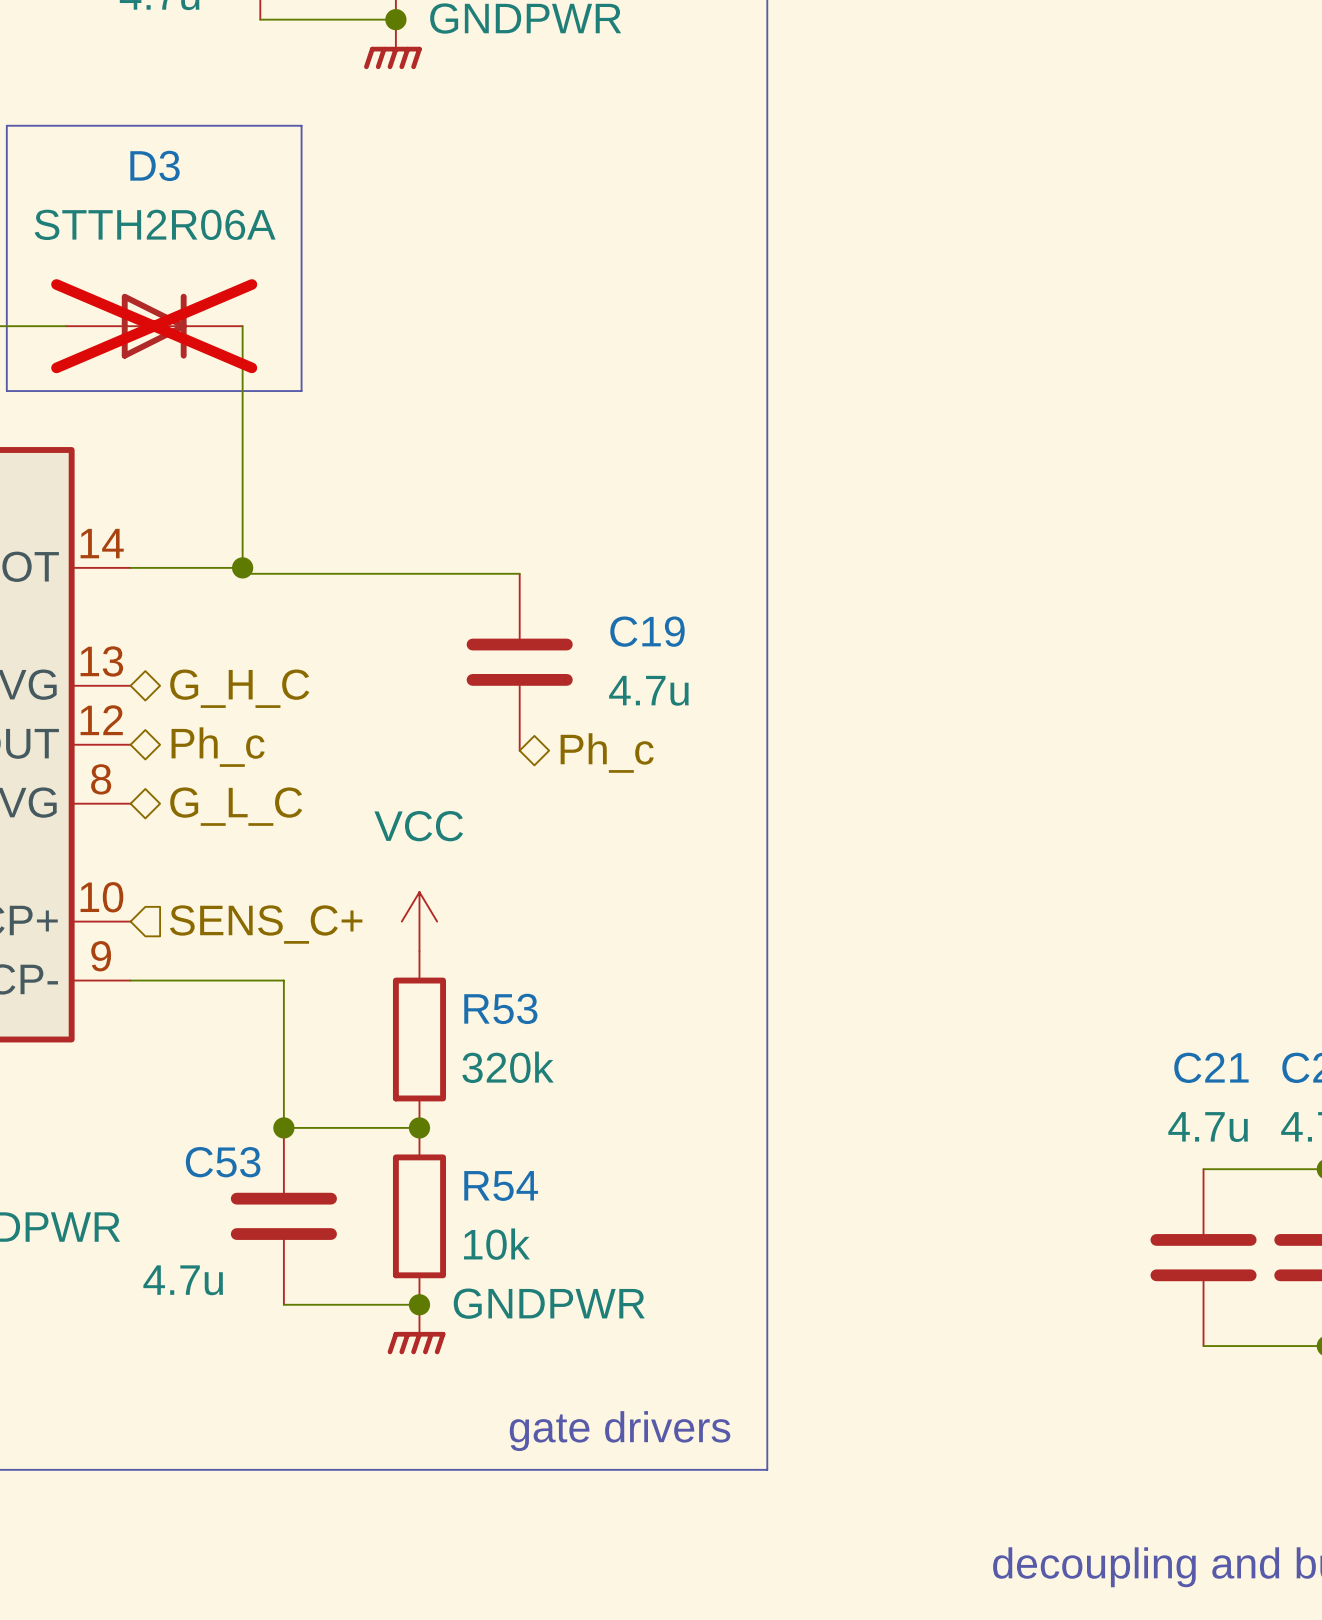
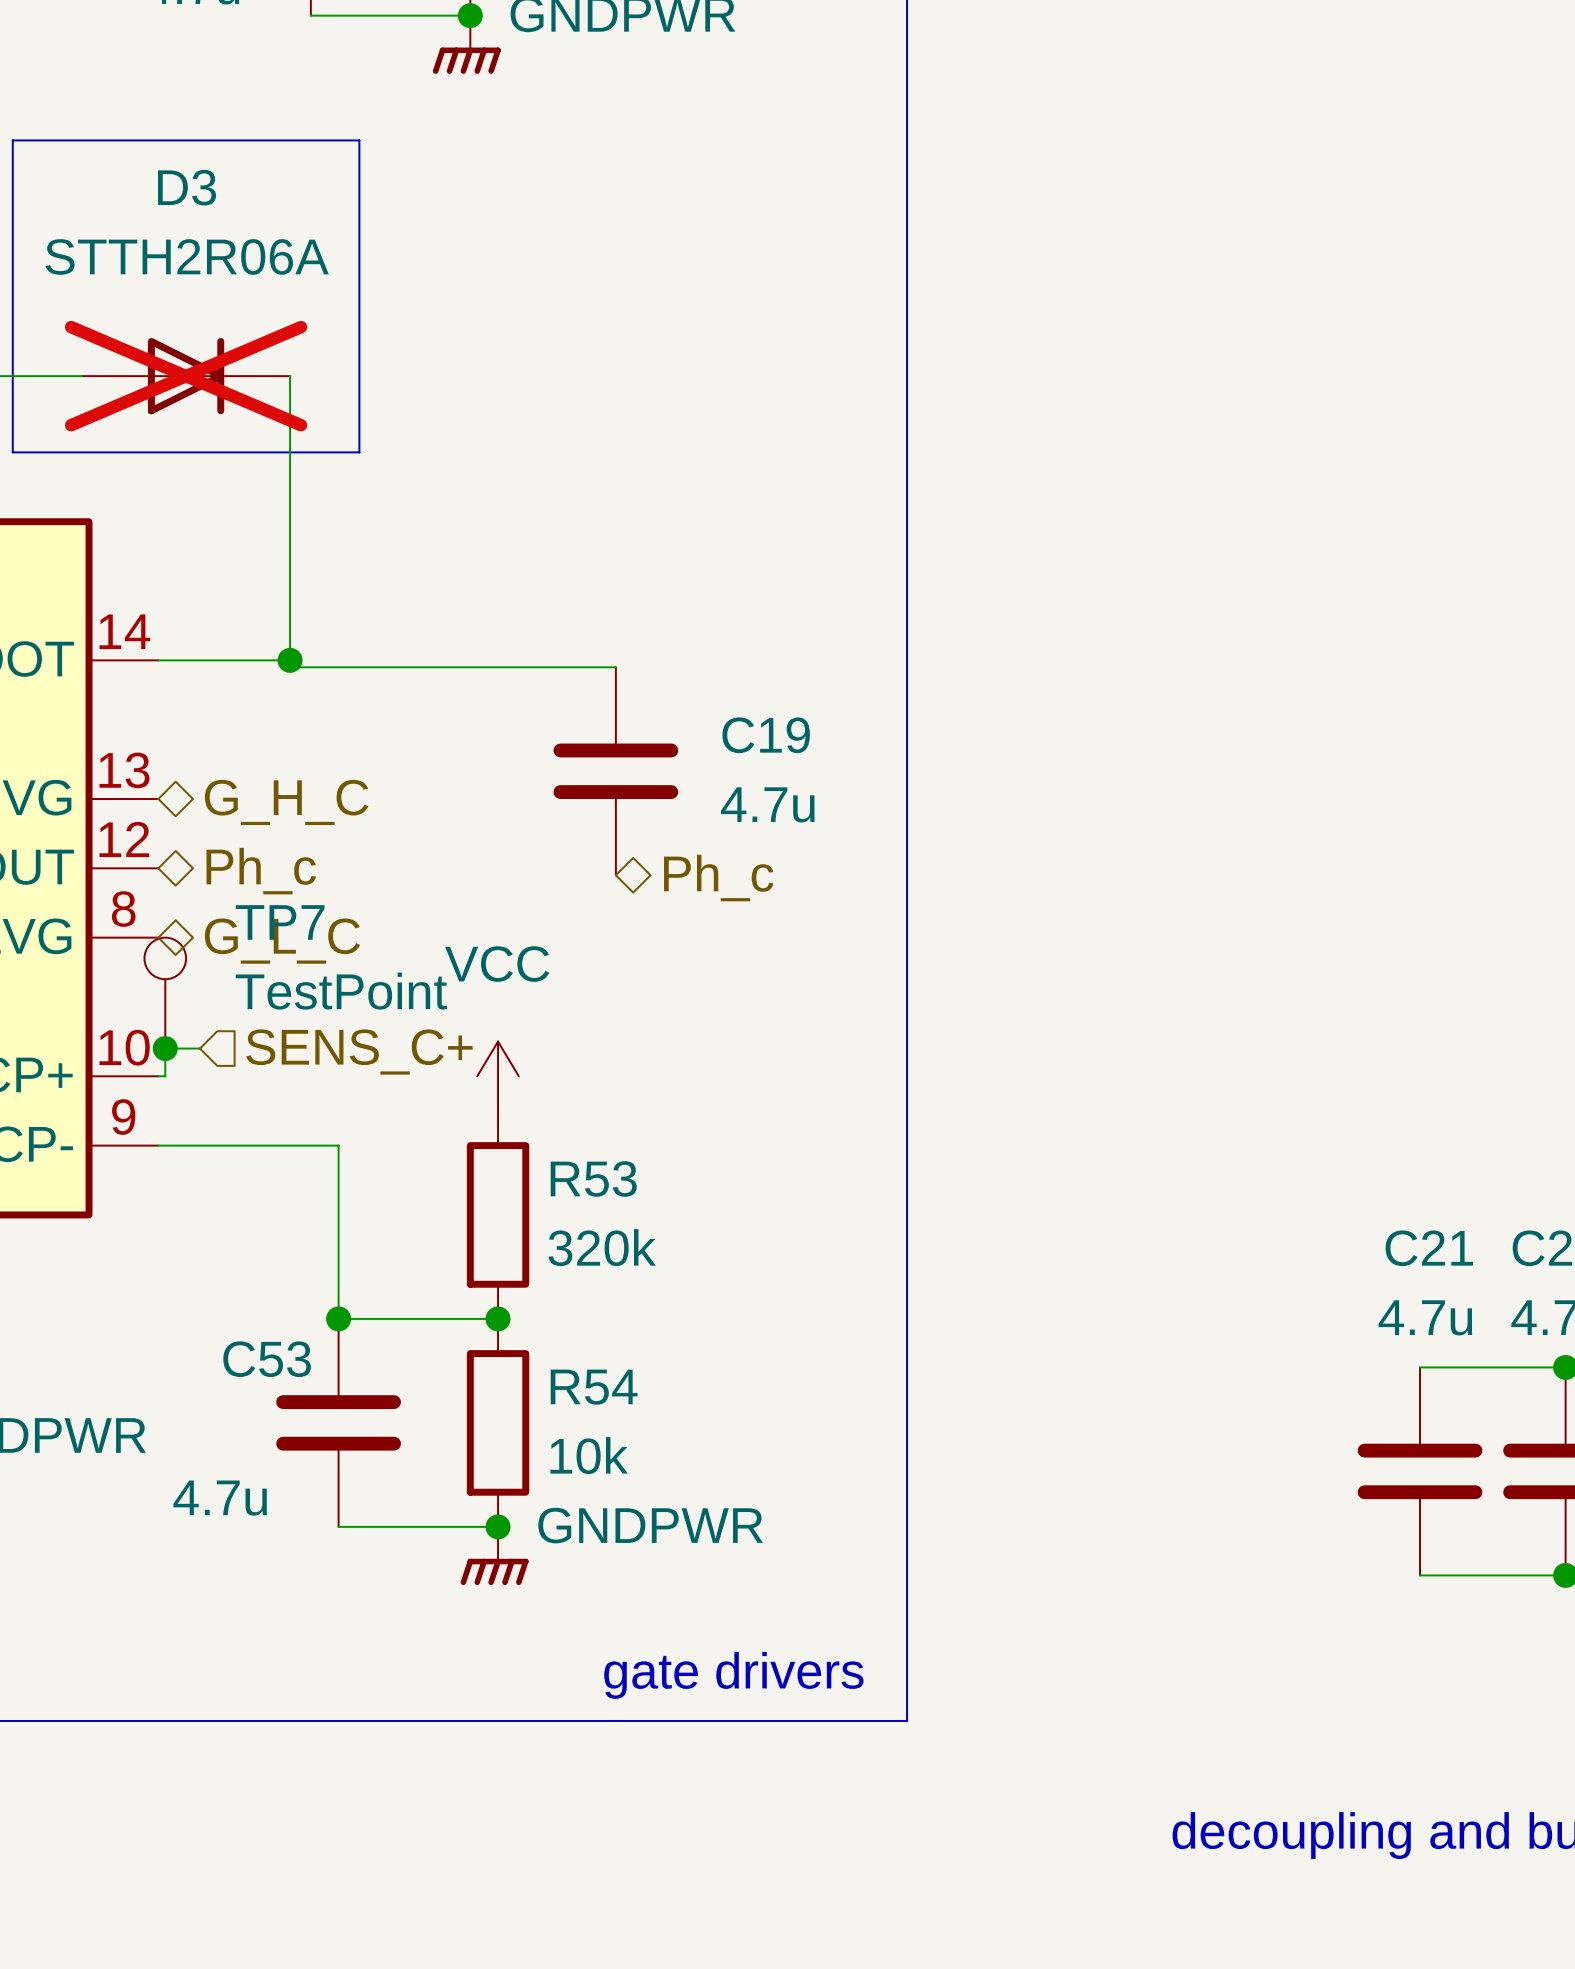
TP7: none -> TestPoint (165, 993)
junction: none -> (165, 1048)
wire: none -> (199, 1048) (165, 1048) (165, 1076) (158, 1076)
hierarchical label position: SENS_C+ (266, 924) -> SENS_C+ (359, 1052)

